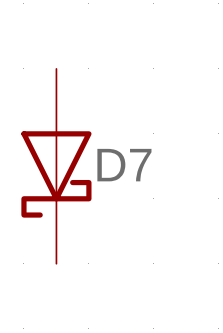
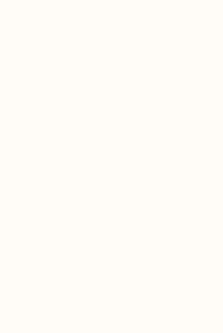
D7: (56, 166) -> none

